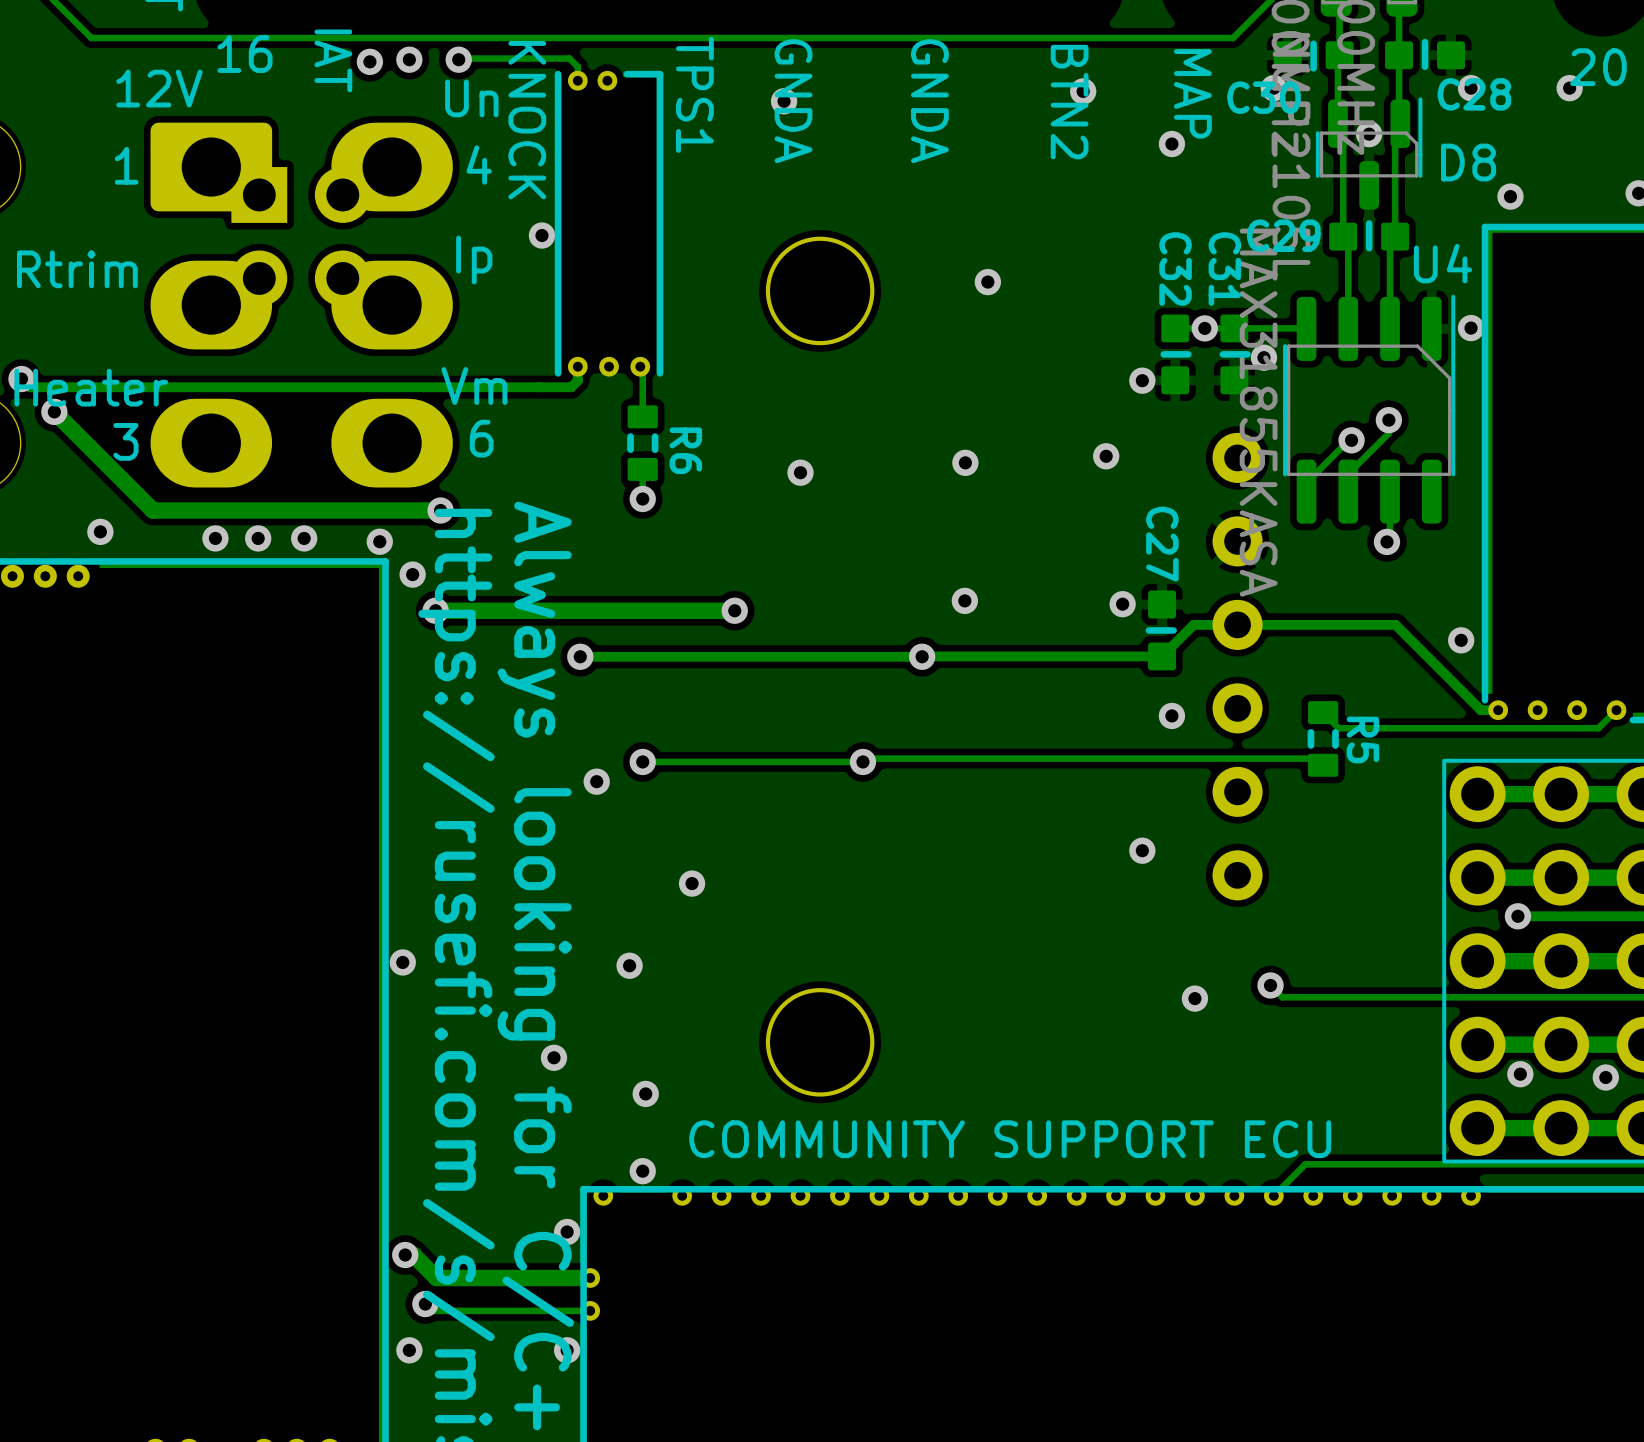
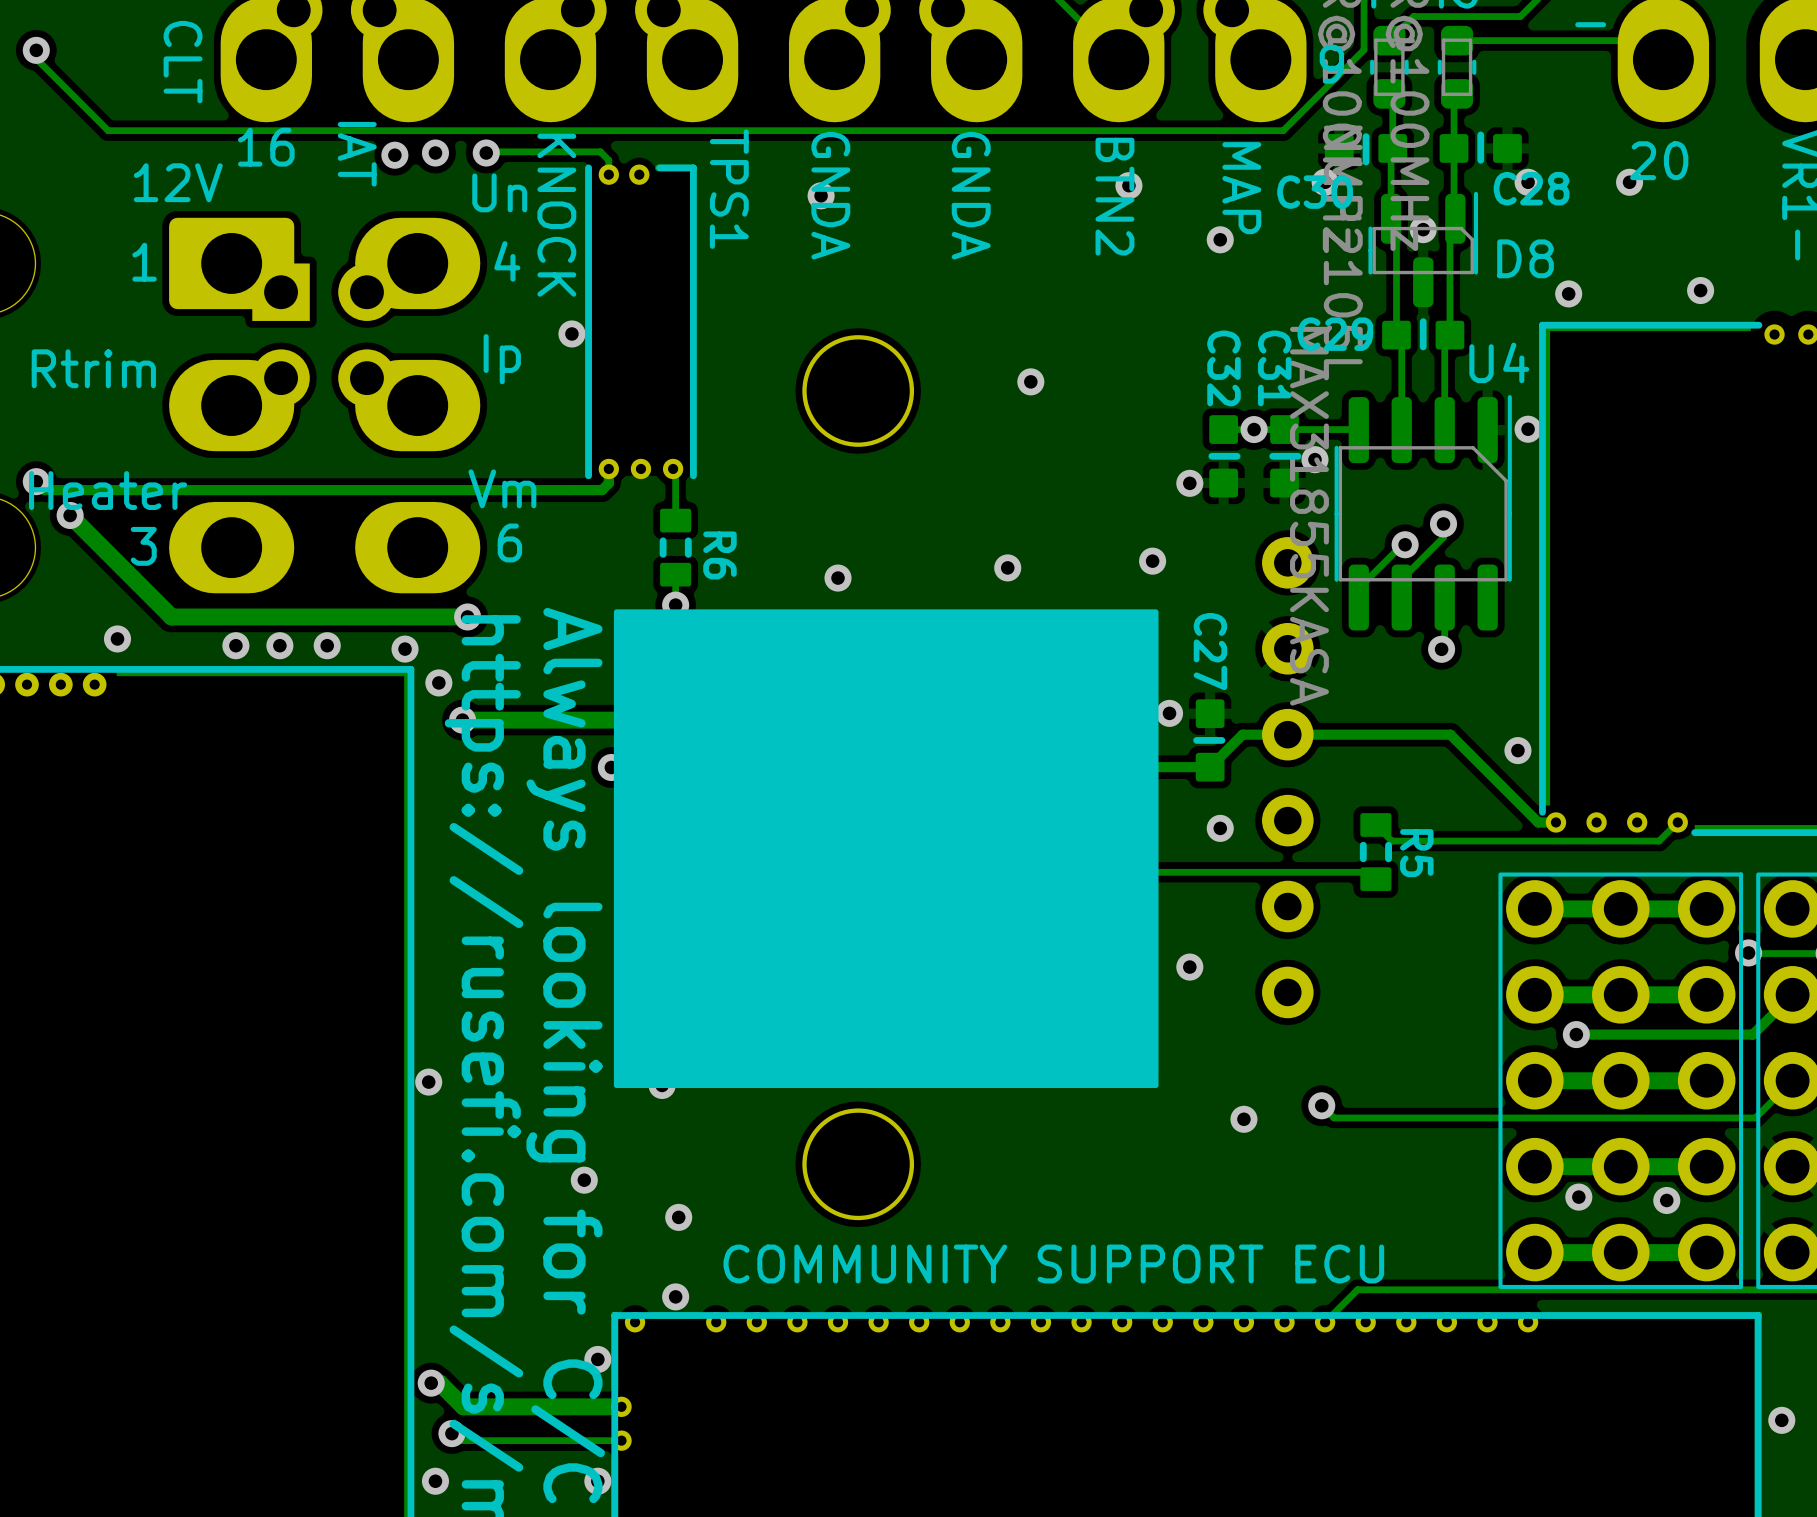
drawing: none -> [613, 609, 1159, 1089]

